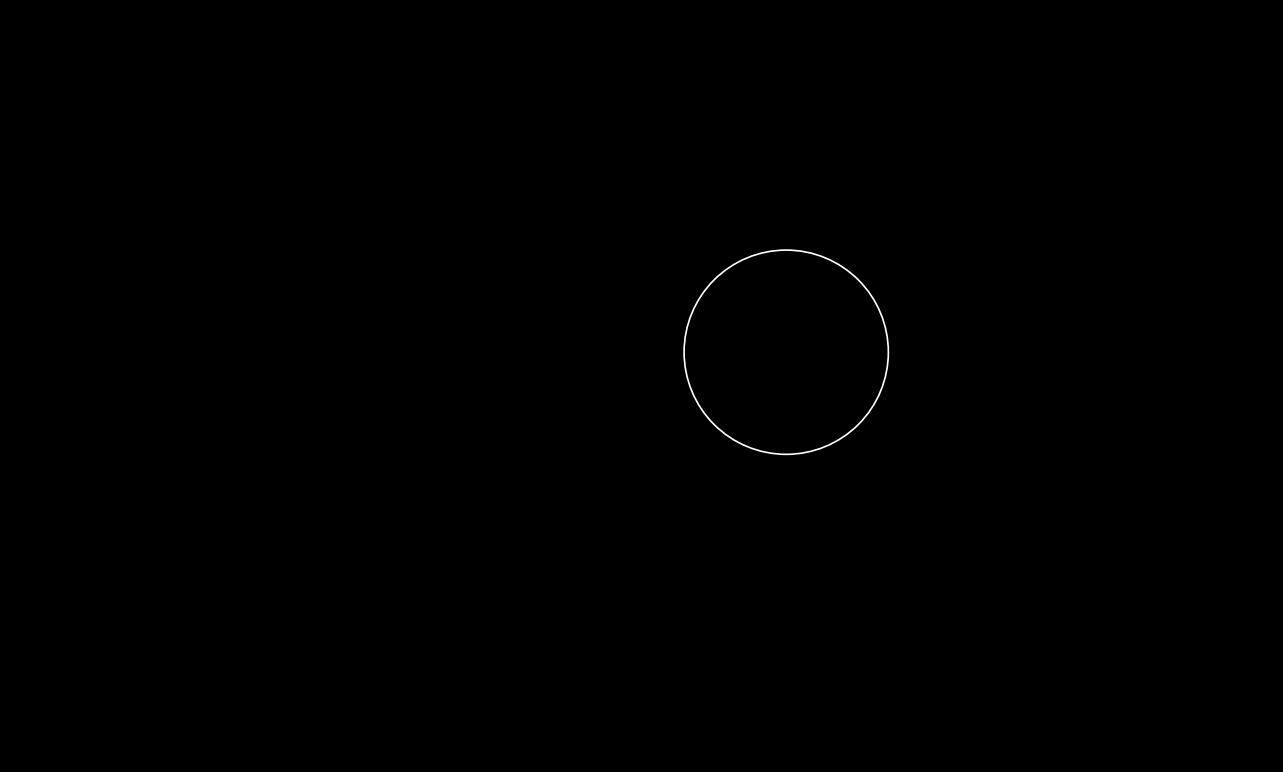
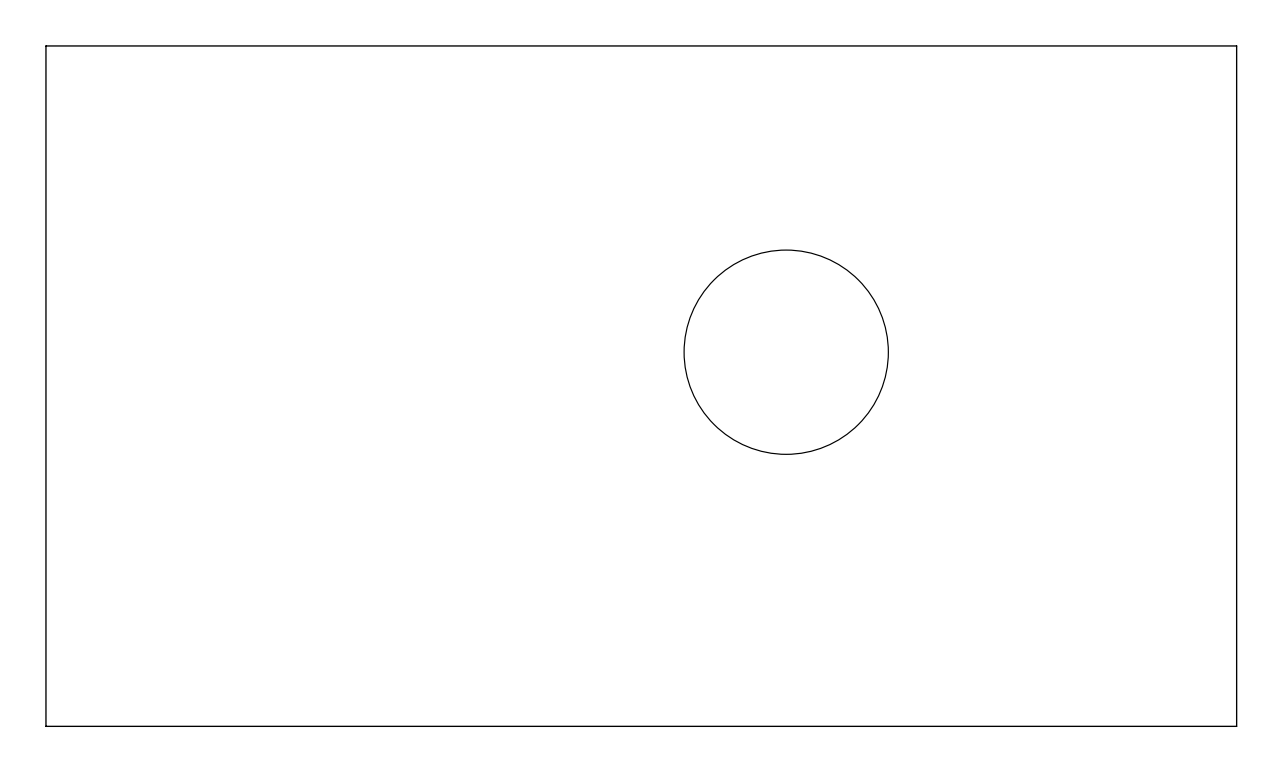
board edge: none -> (1236, 45) (1236, 726) (45, 726) (45, 45) (1236, 45)

